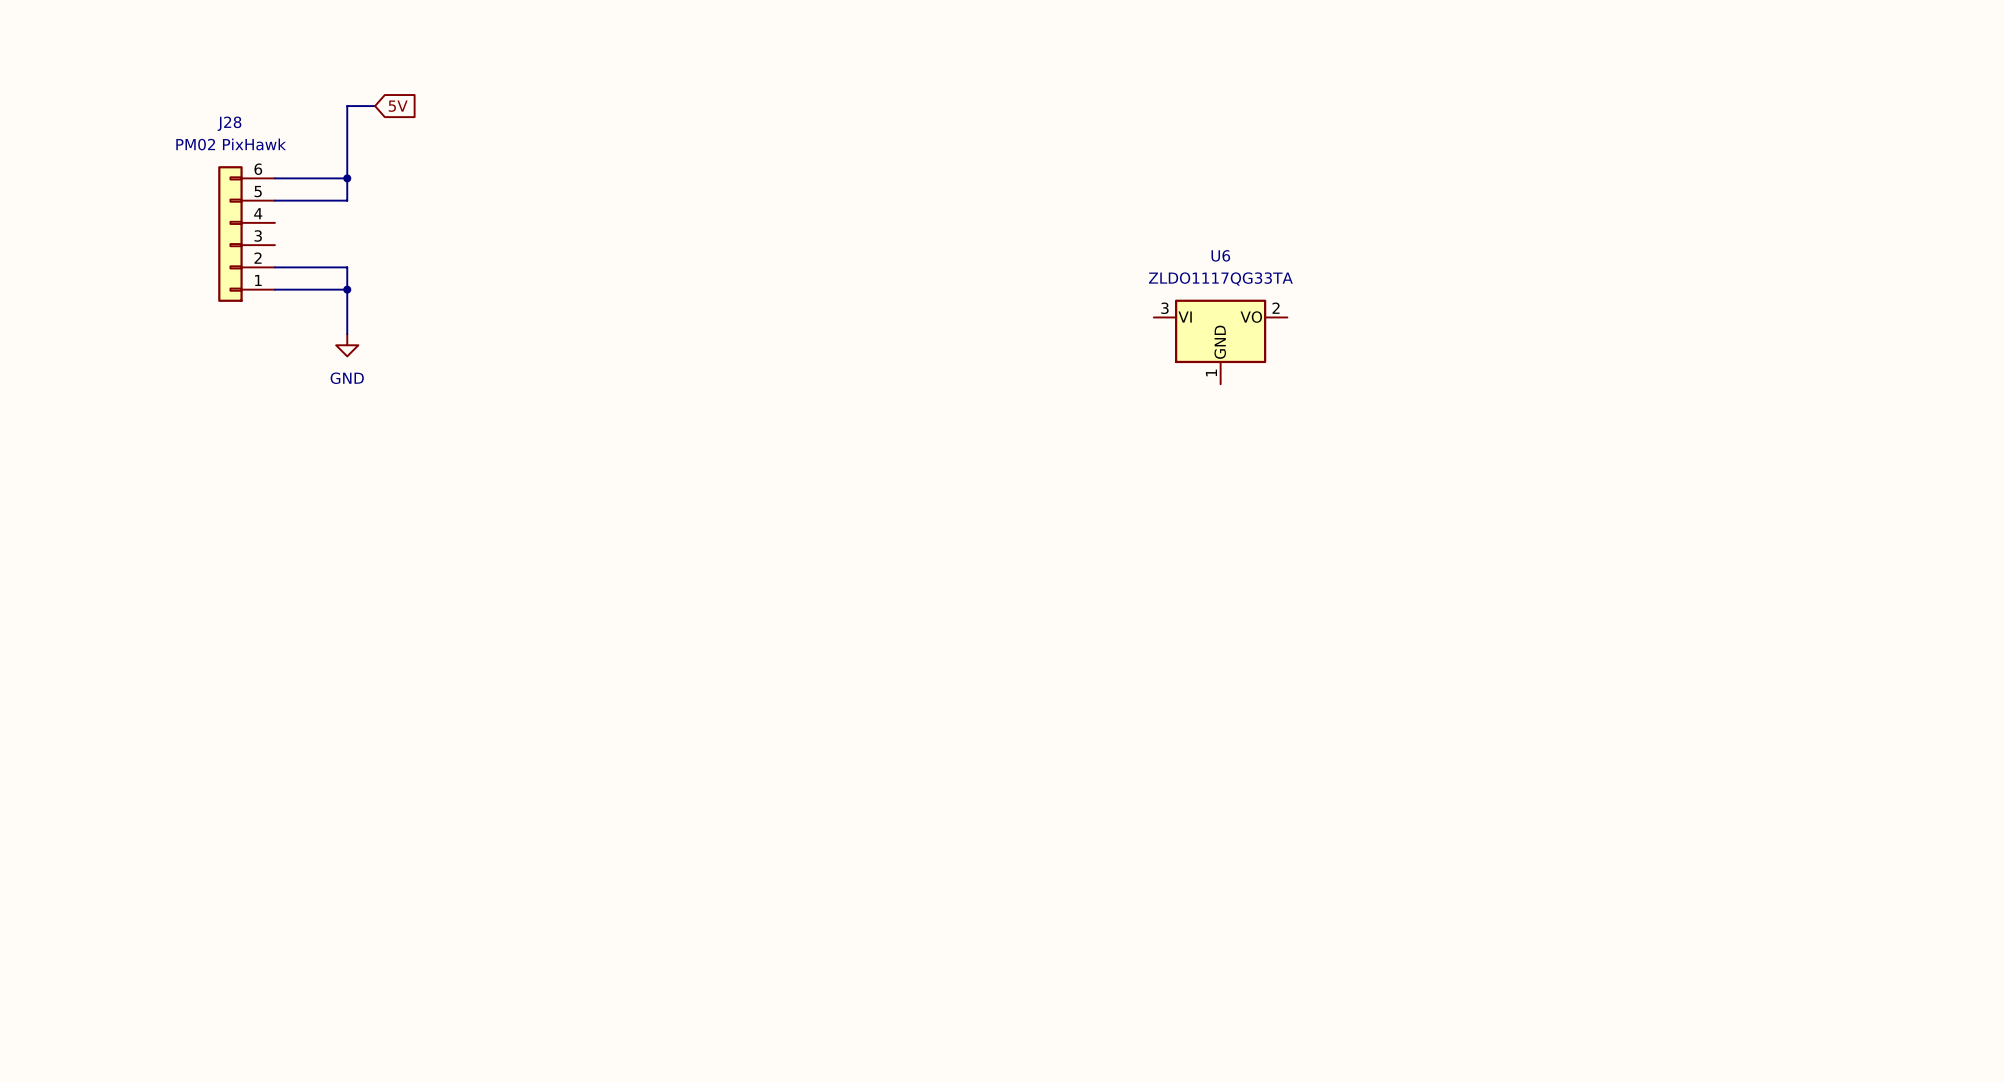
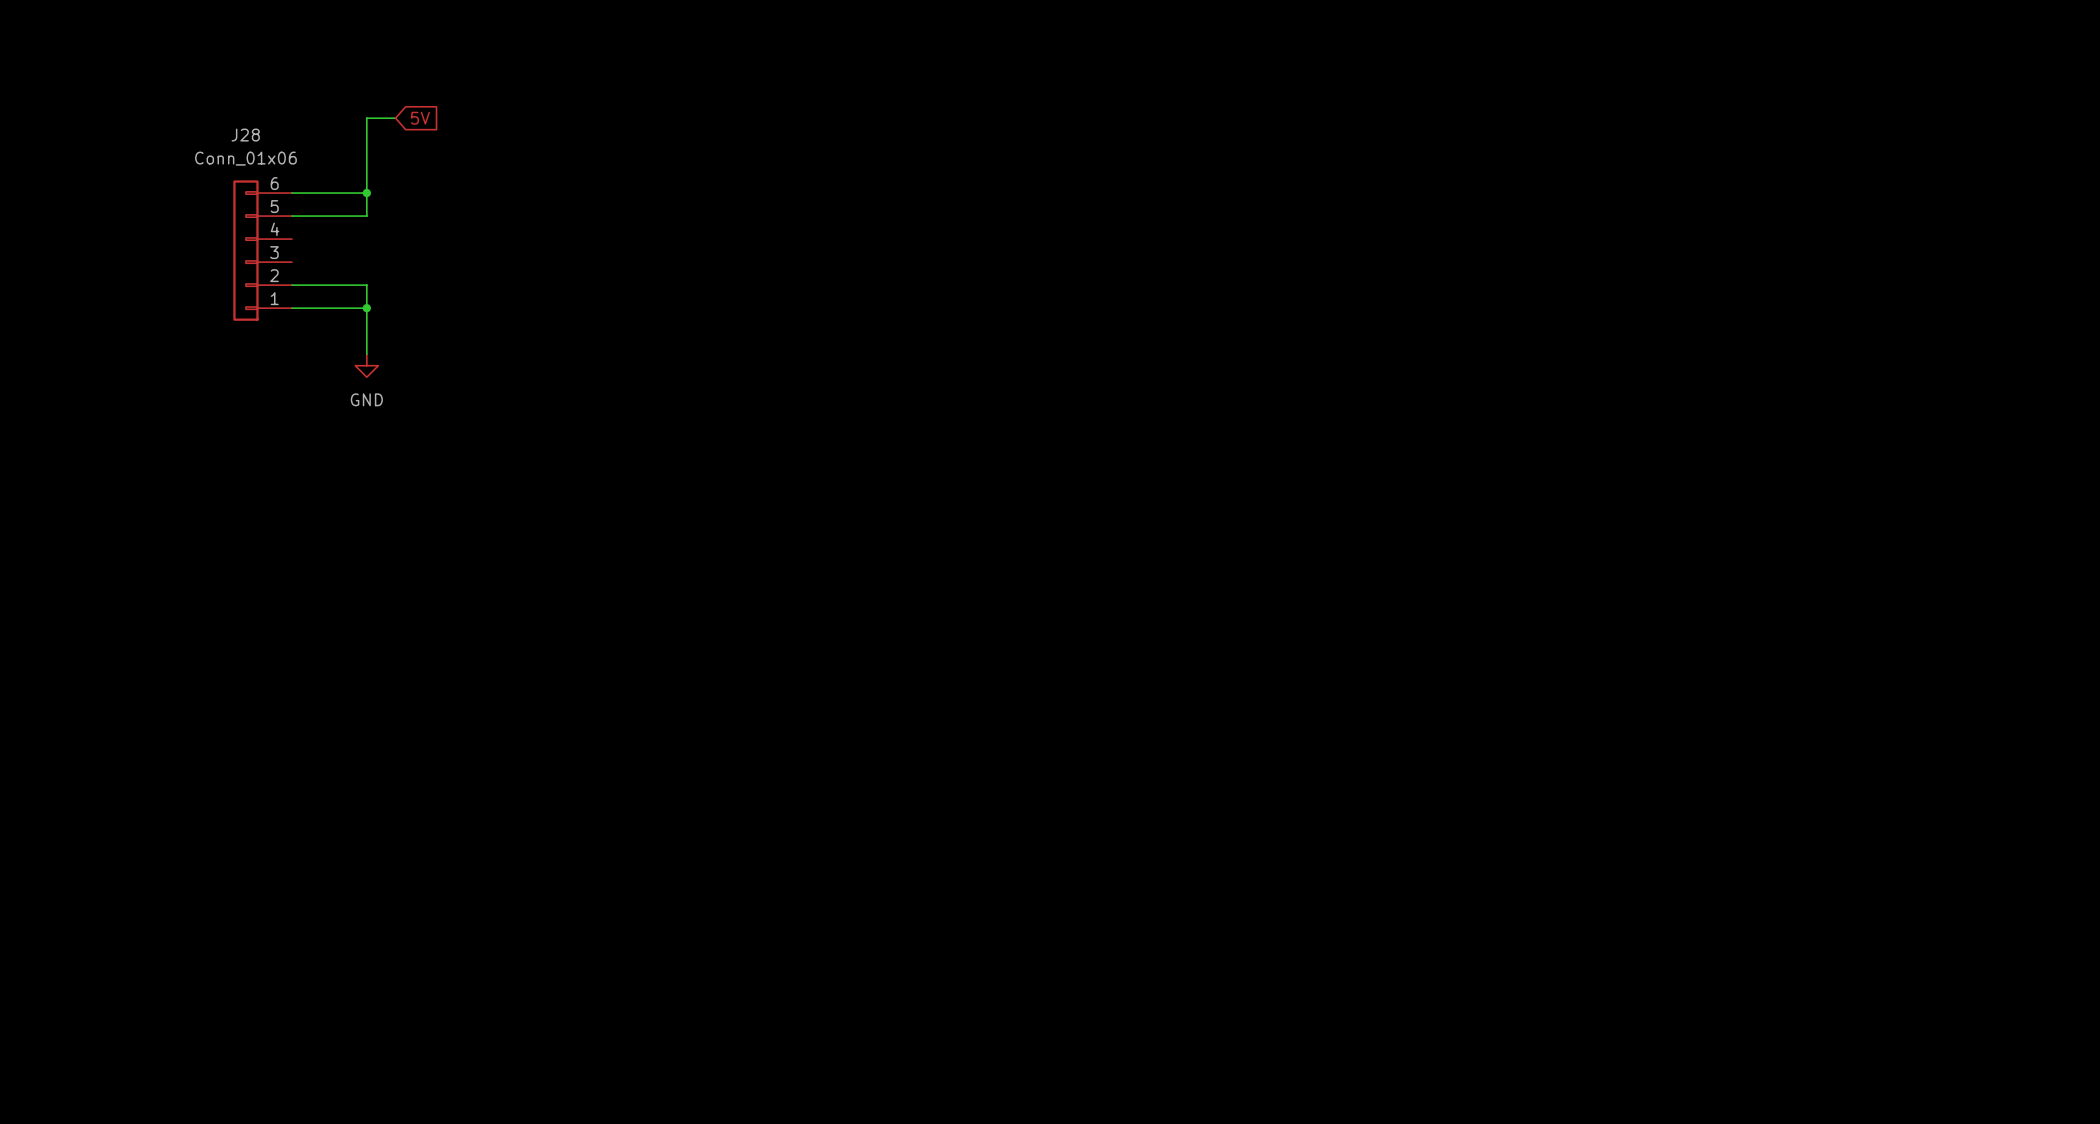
J28 value: PM02 PixHawk (231, 144) -> Conn_01x06 (245, 158)
U6: ZLDO1117QG33TA (1220, 341) -> none

